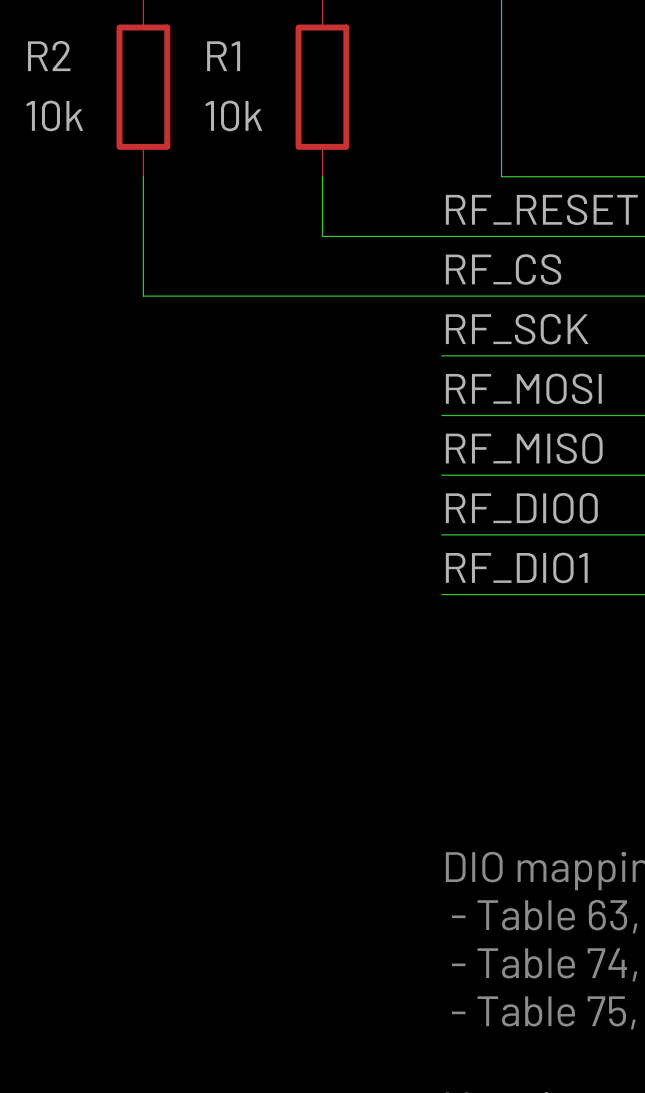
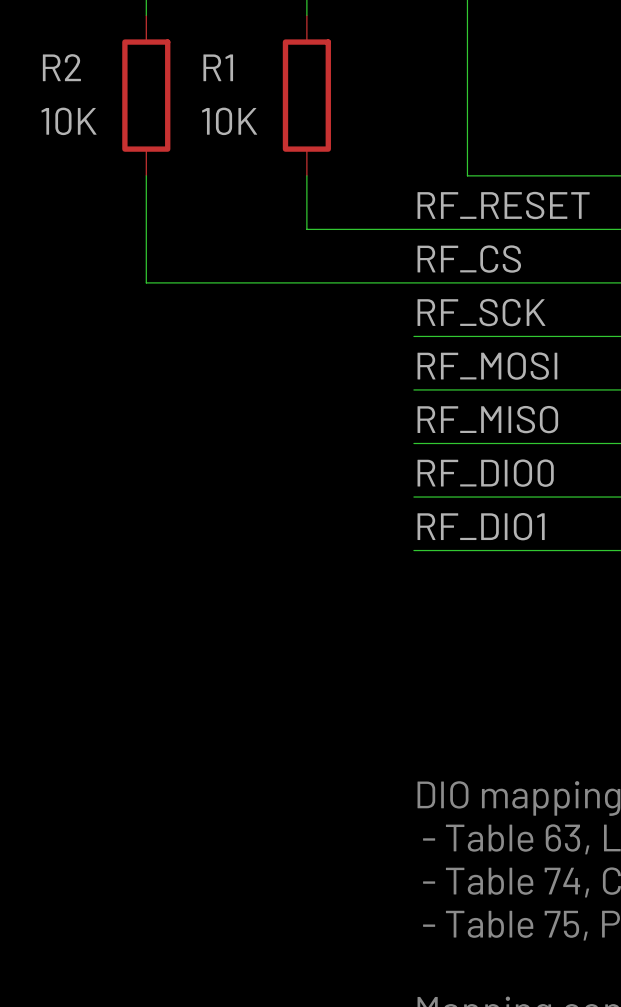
R2 value: 10k (54, 115) -> 10K (69, 121)
R1 value: 10k (233, 115) -> 10K (229, 121)

